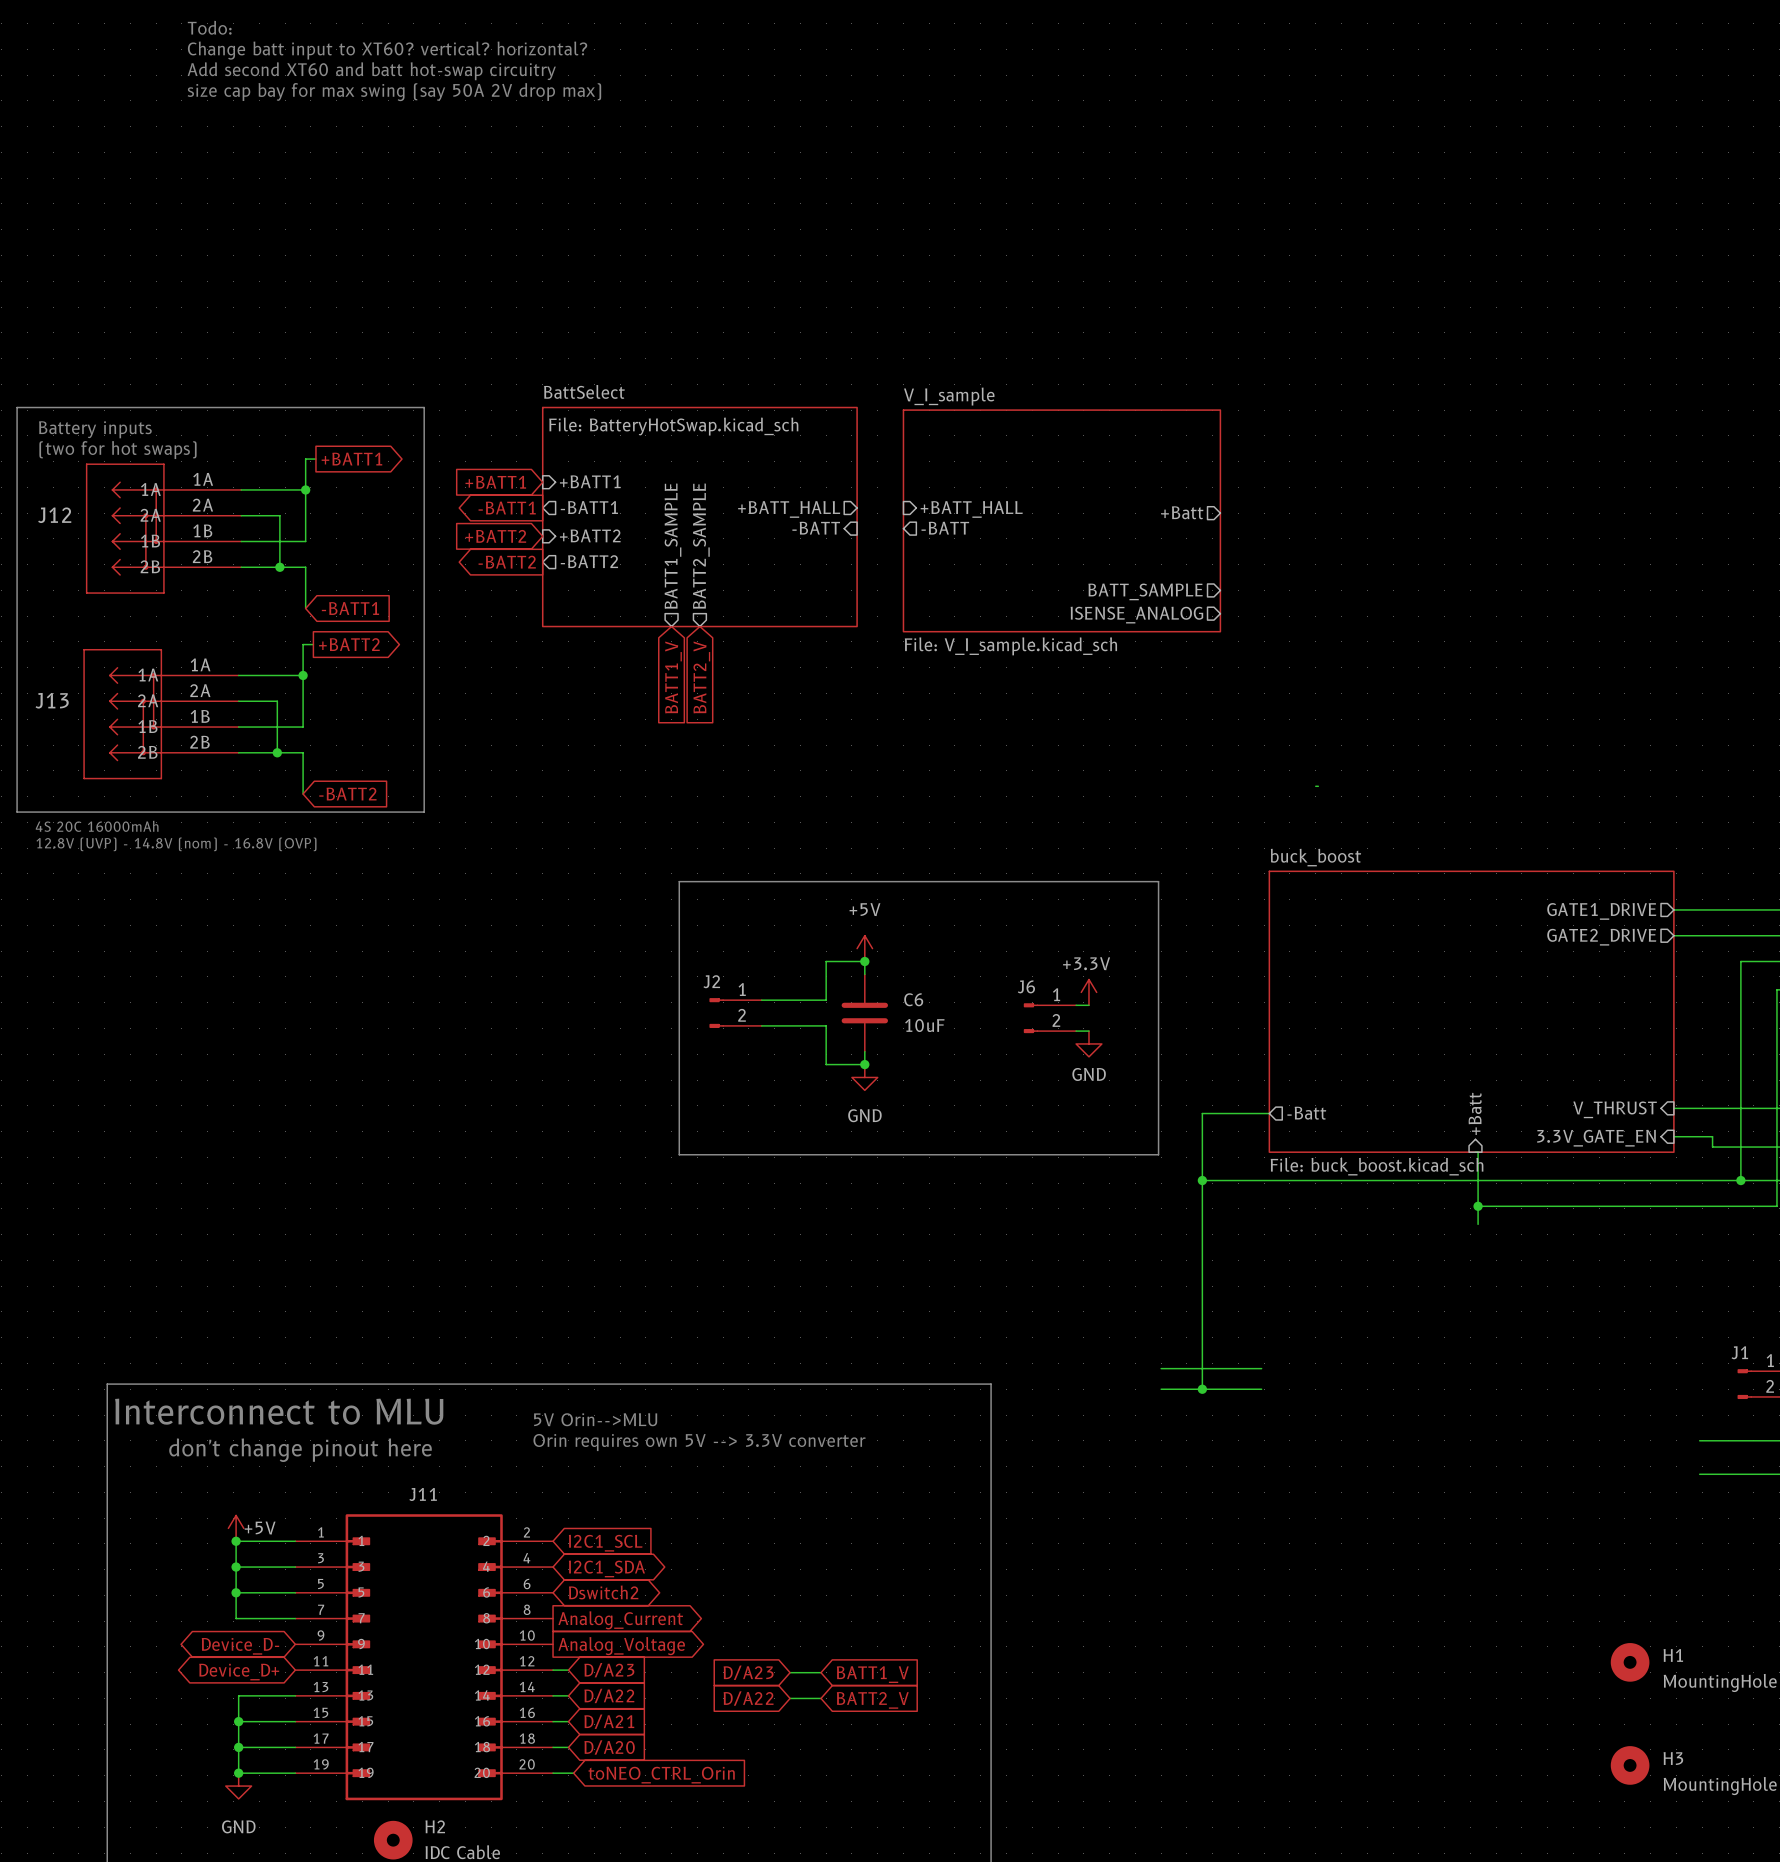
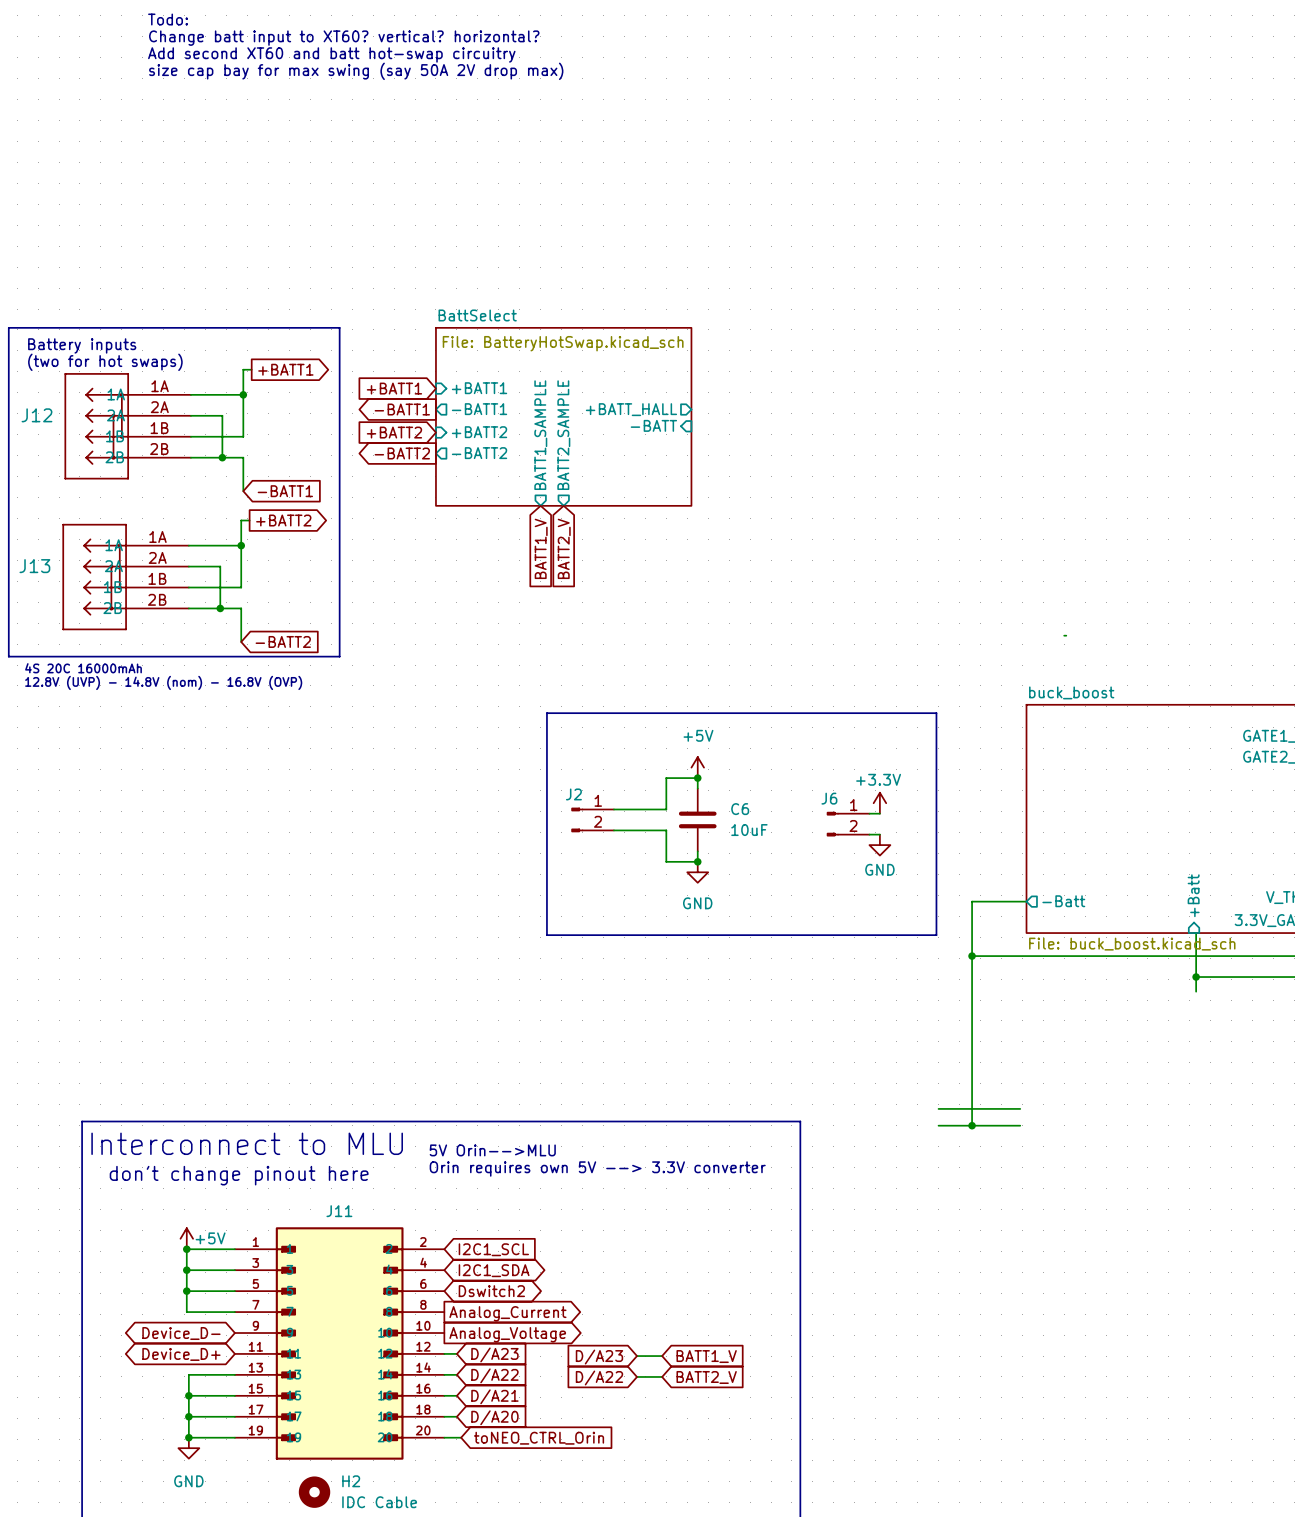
sheet pin: +BATT_HALL (971, 509) -> none
sheet pin: +Batt (1182, 512) -> none
sheet V_I_sample: File: V_I_sample.kicad_sch (1061, 520) -> none
sheet pin: -BATT (945, 528) -> none
sheet pin: BATT_SAMPLE (1145, 591) -> none
sheet pin: ISENSE_ANALOG (1136, 615) -> none

